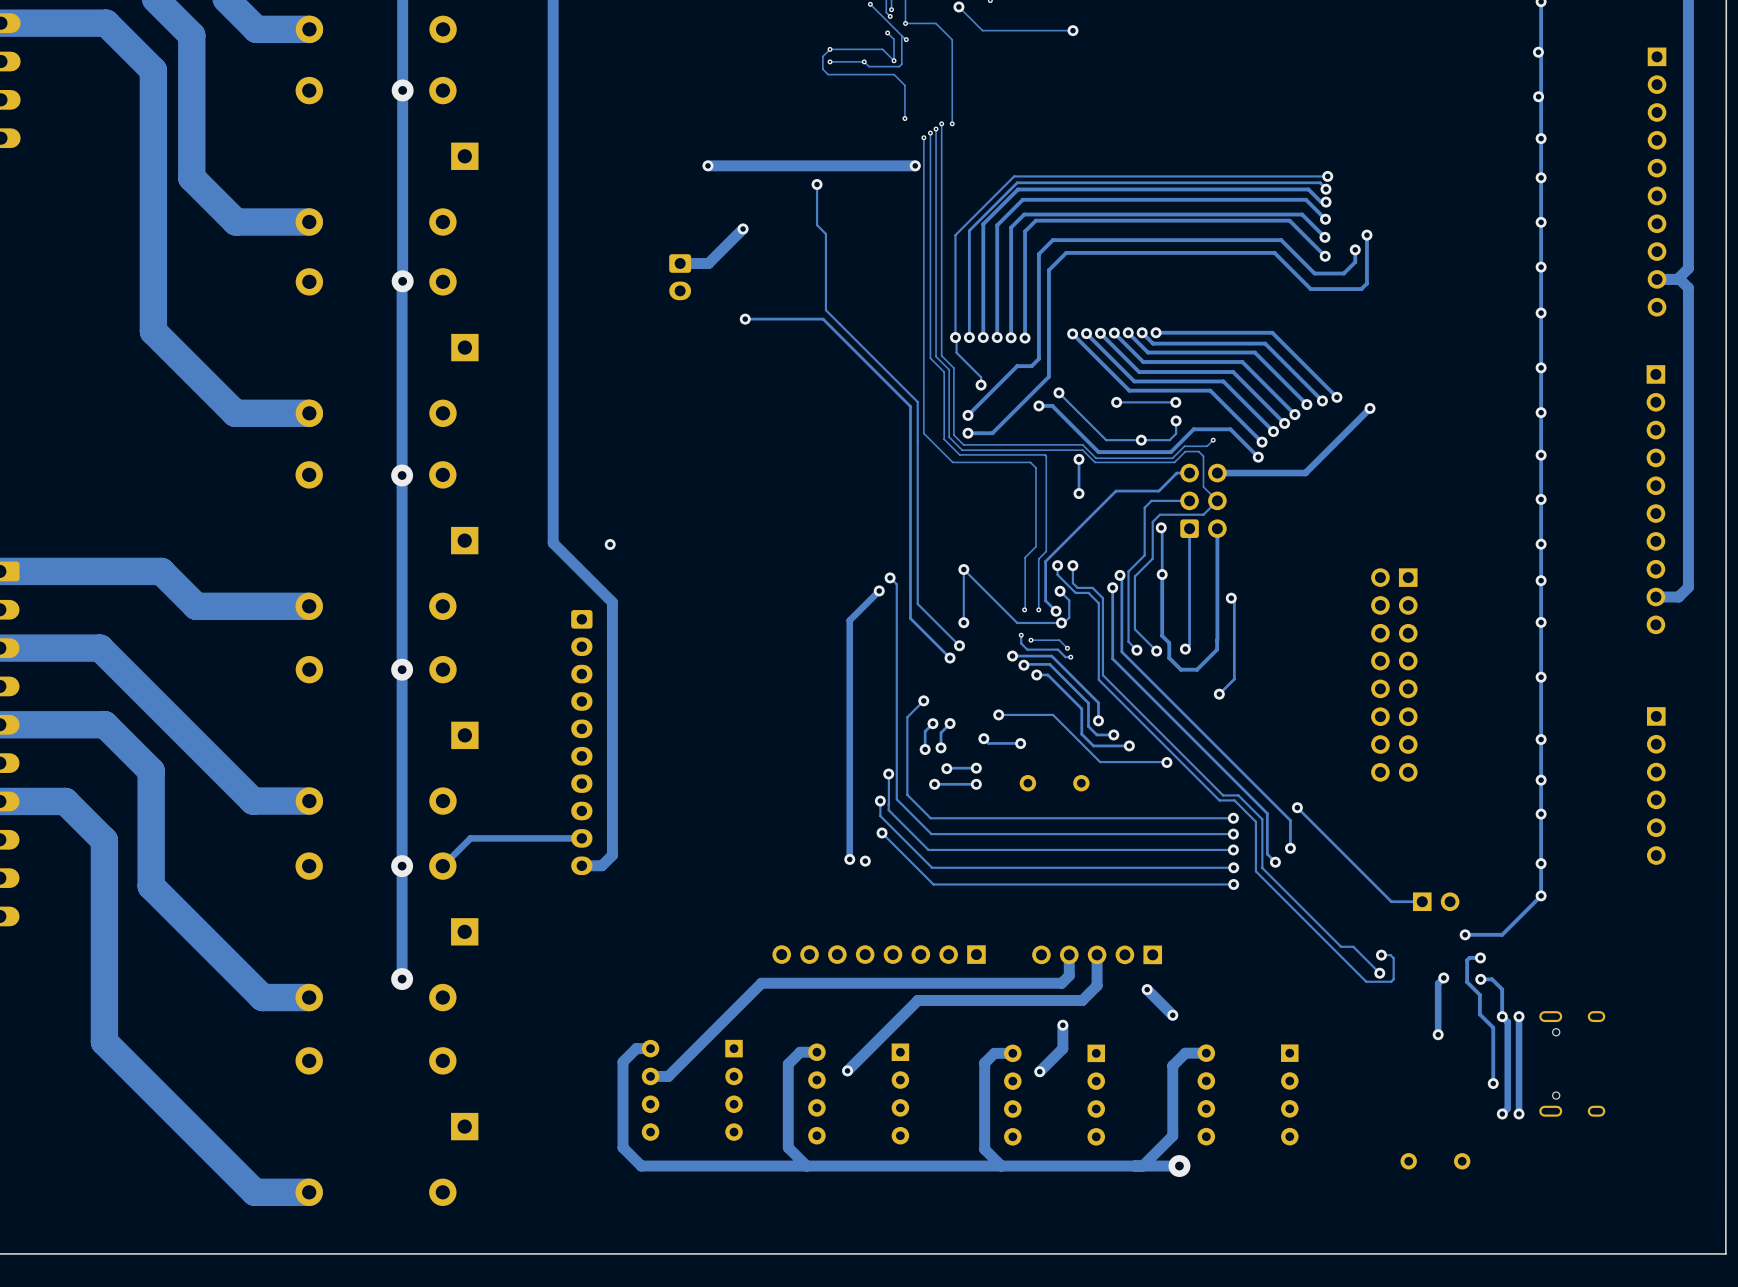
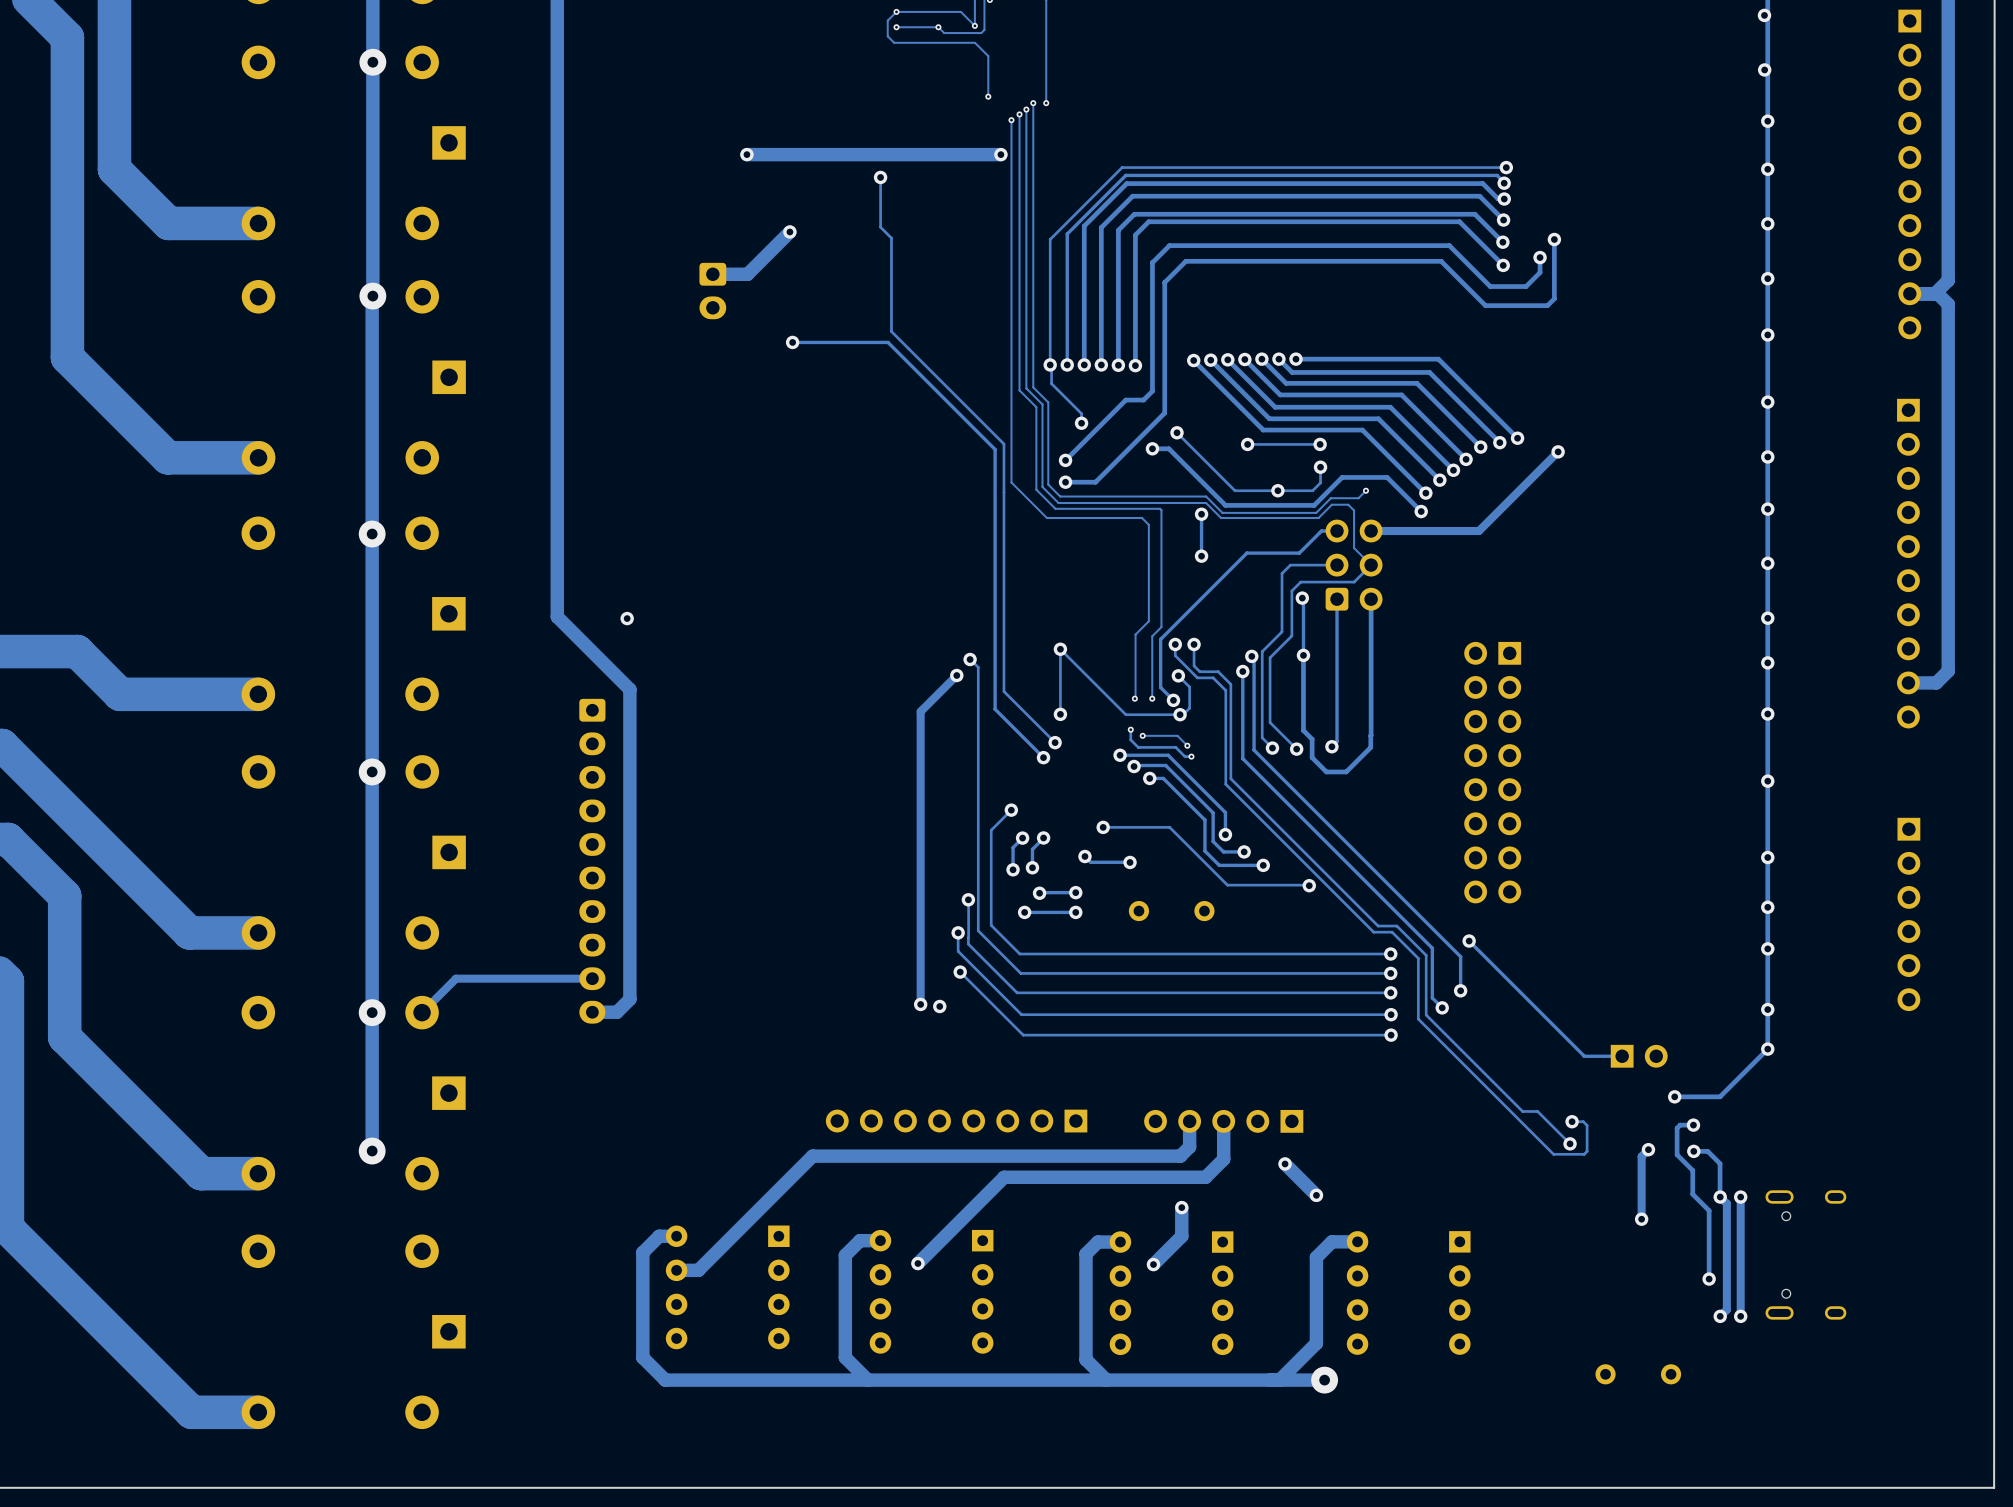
track: (1231, 598) (1234, 601) (1234, 679) (1219, 694) -> none
via: (1231, 598) -> none
part position: (1394, 674) -> (1492, 772)
via: (1219, 694) -> none

